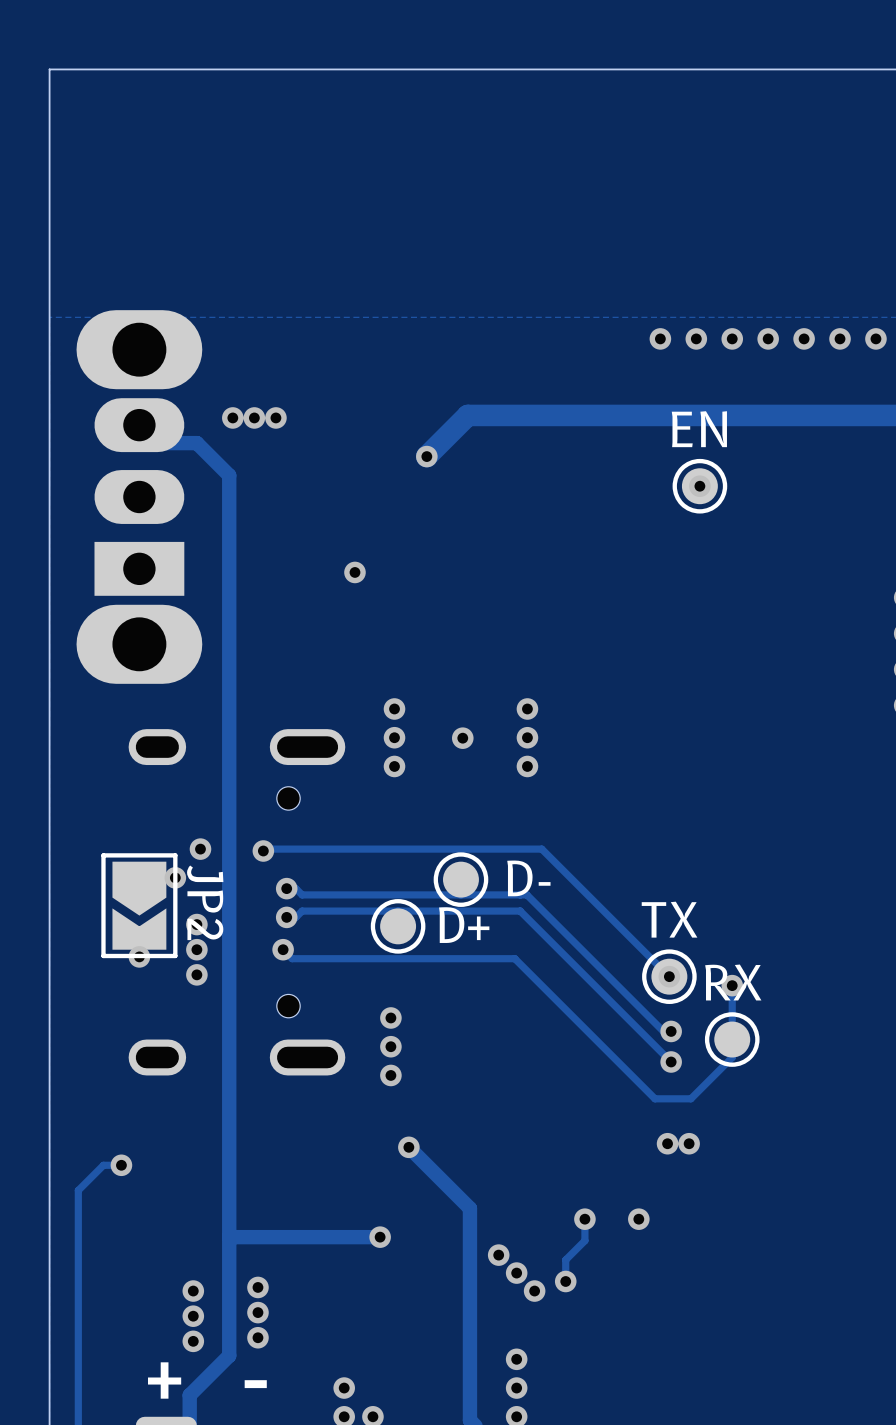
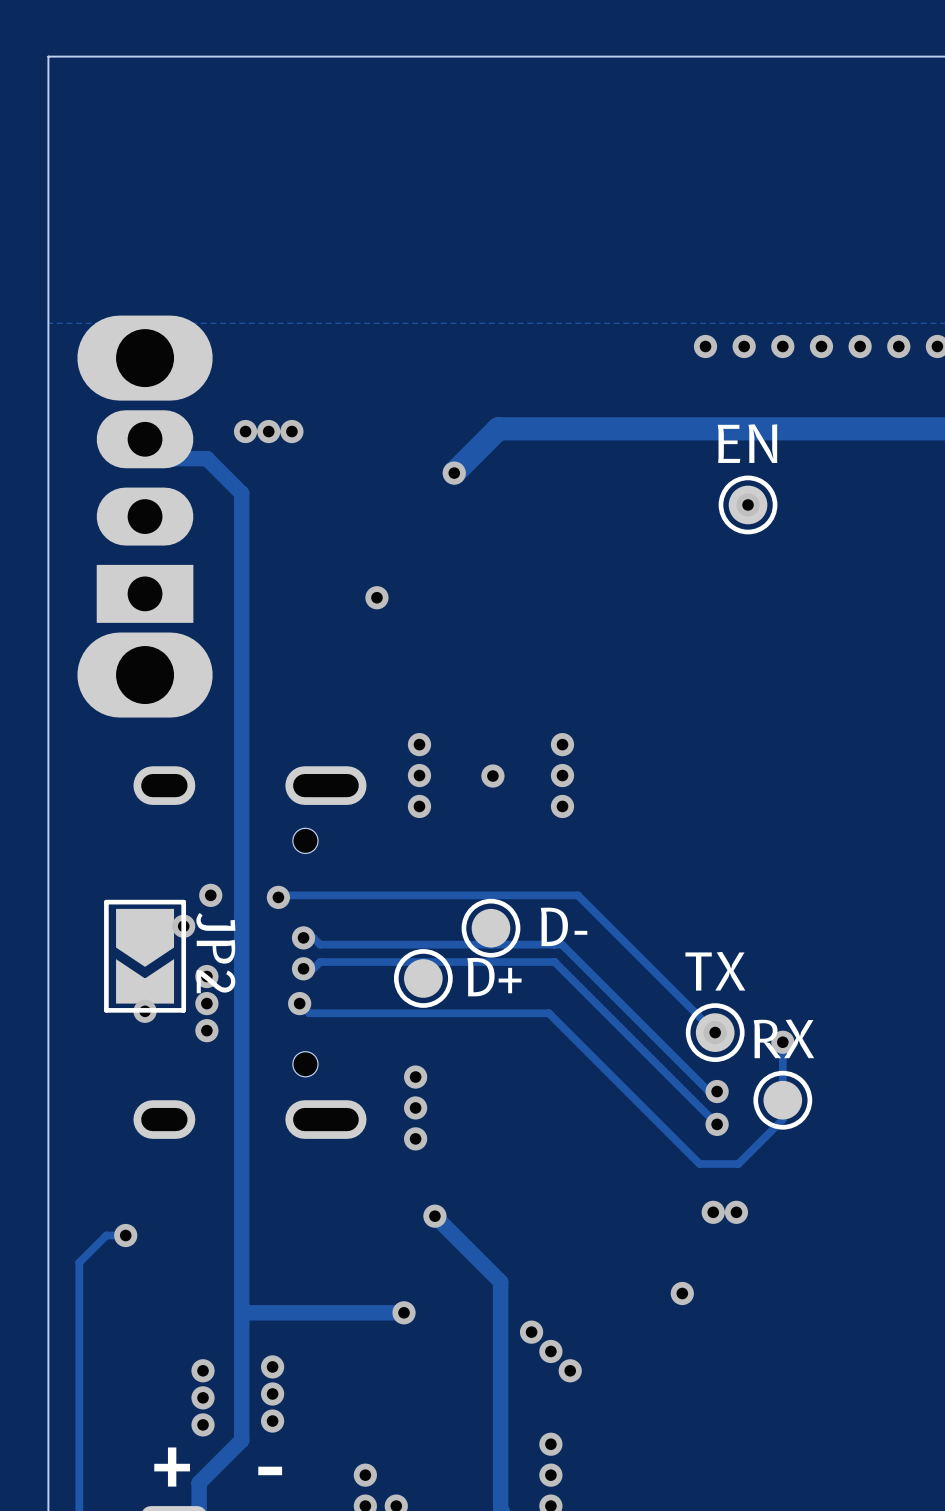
track: (584, 1219) (584, 1240) (565, 1259) (565, 1281) -> none
via: (584, 1219) -> none
via: (565, 1281) -> none

